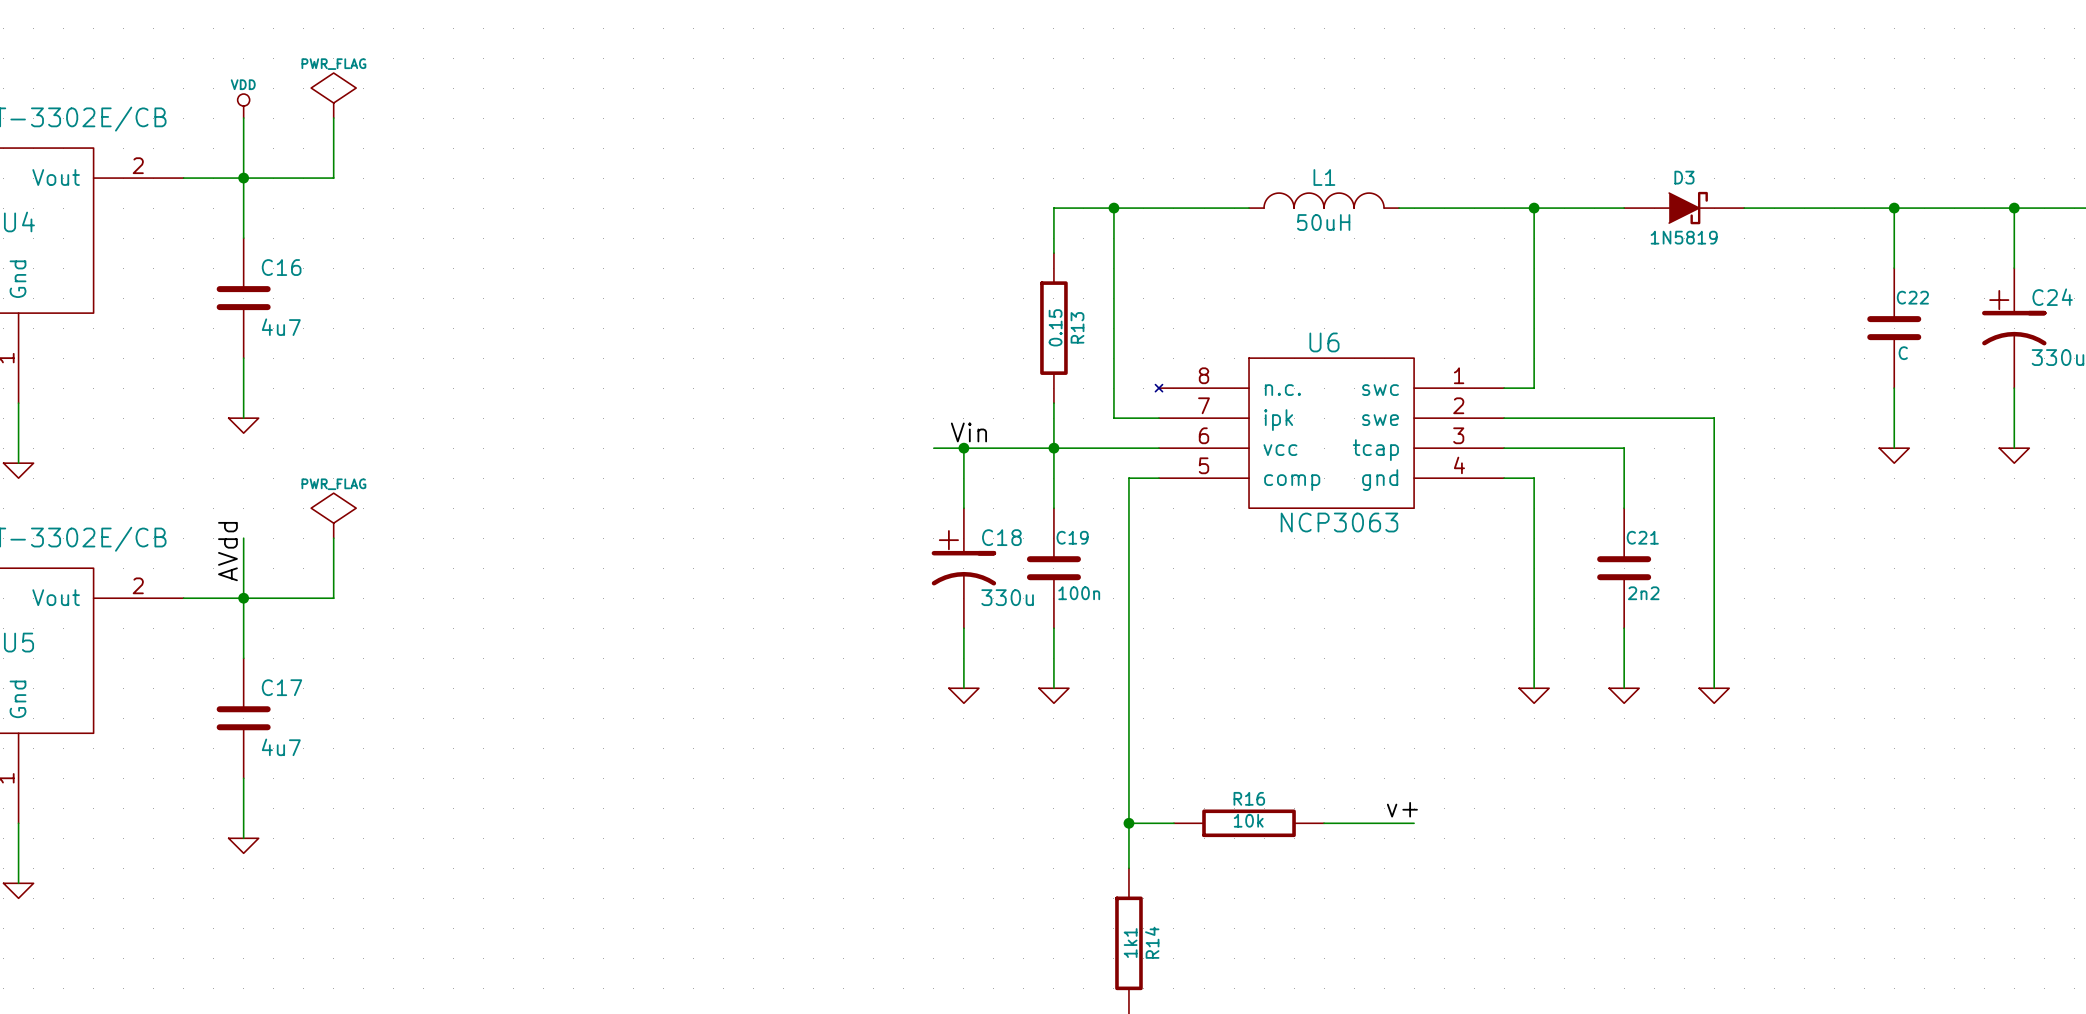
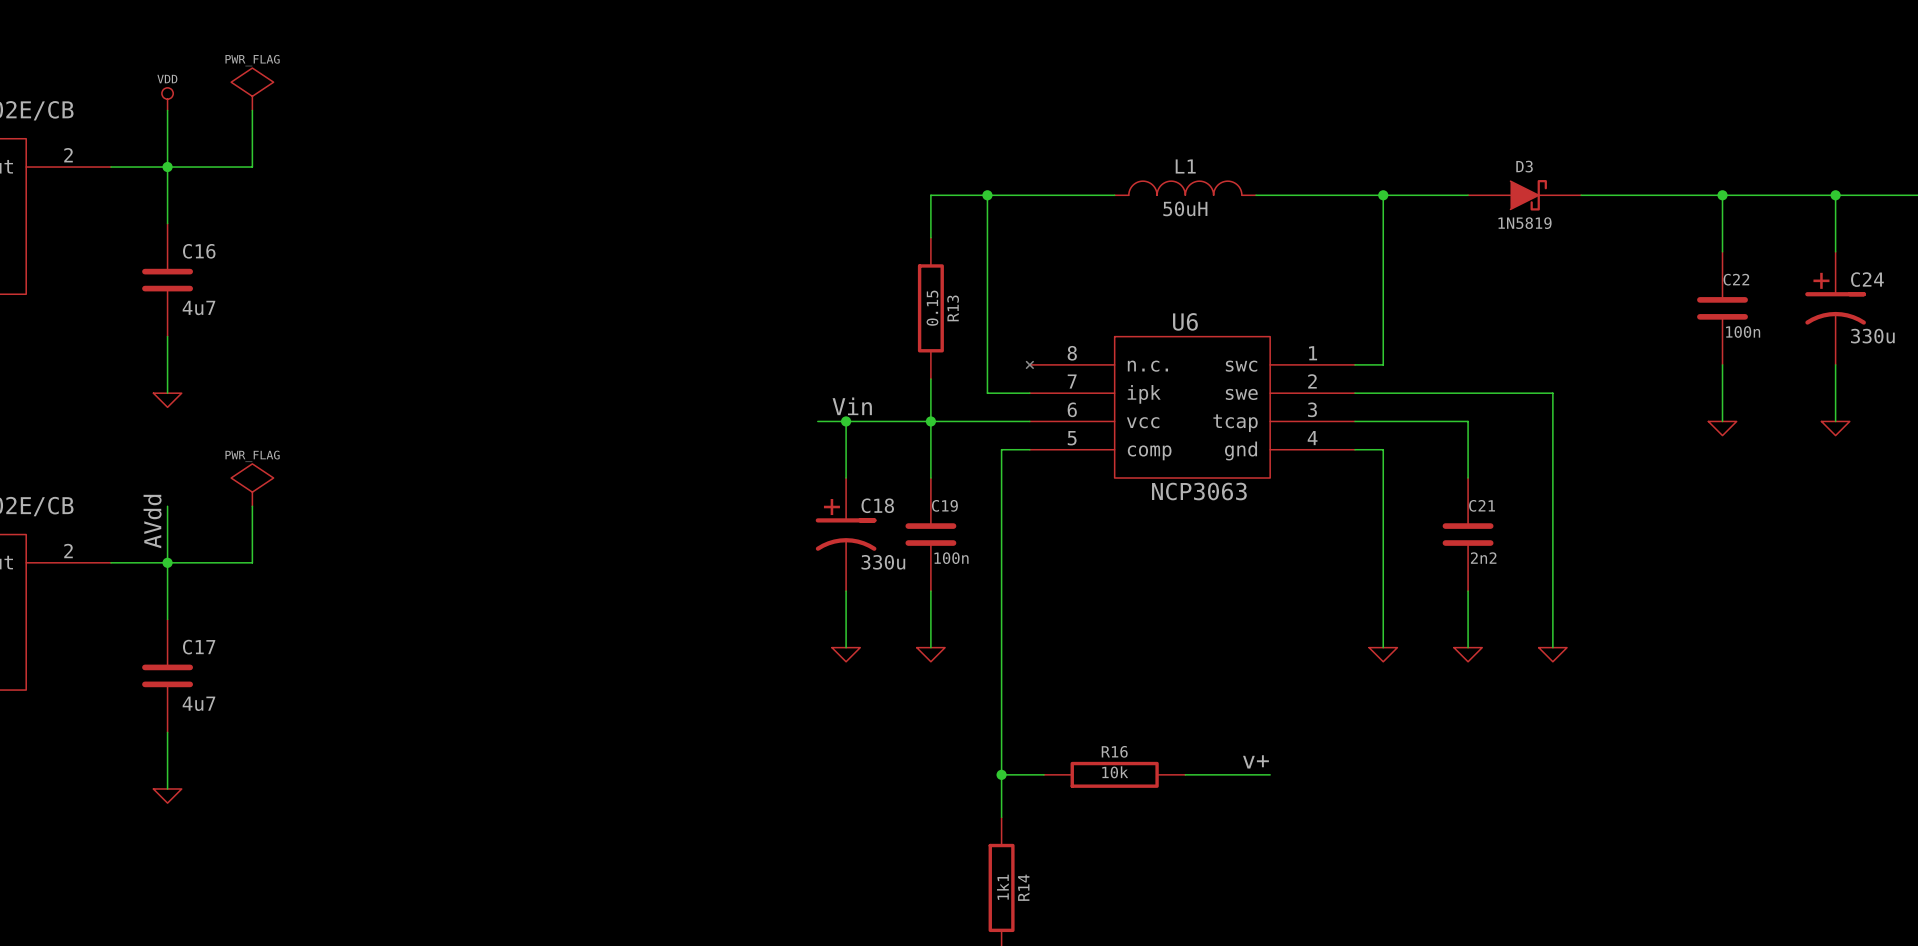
C22 value: C (1903, 353) -> 100n (1743, 331)

